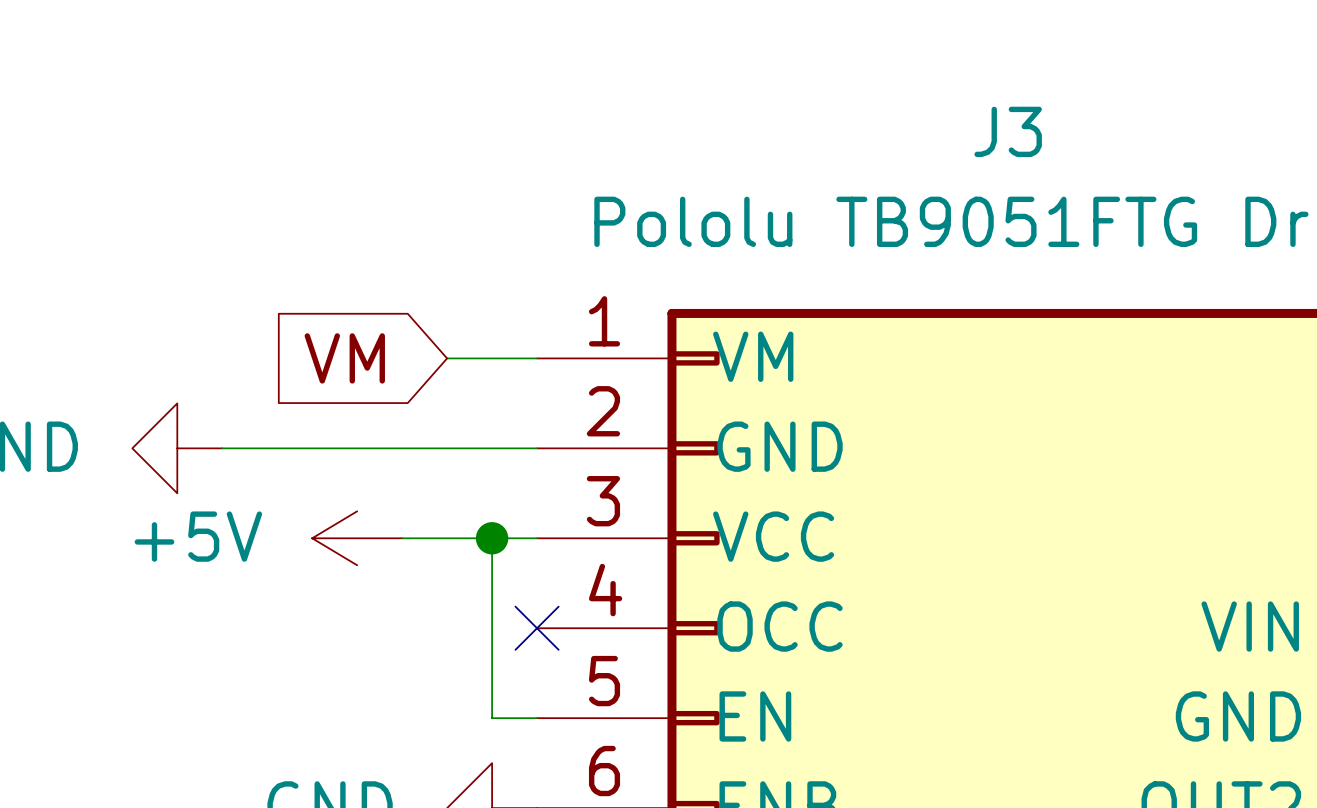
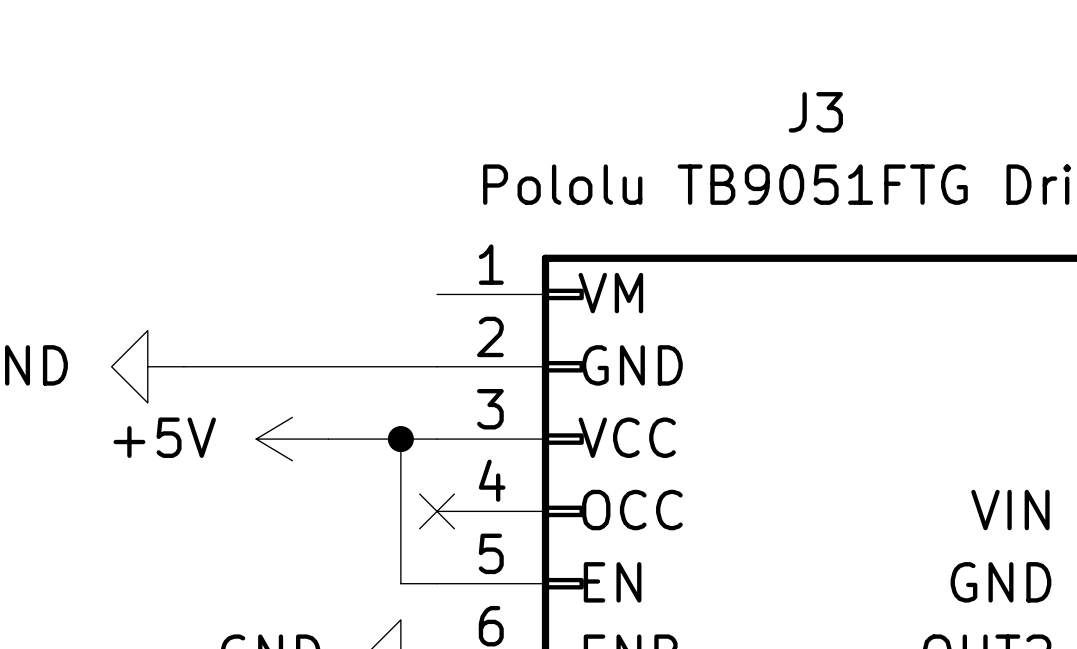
global label: VM (344, 358) -> none
wire: (447, 358) (537, 358) -> none

